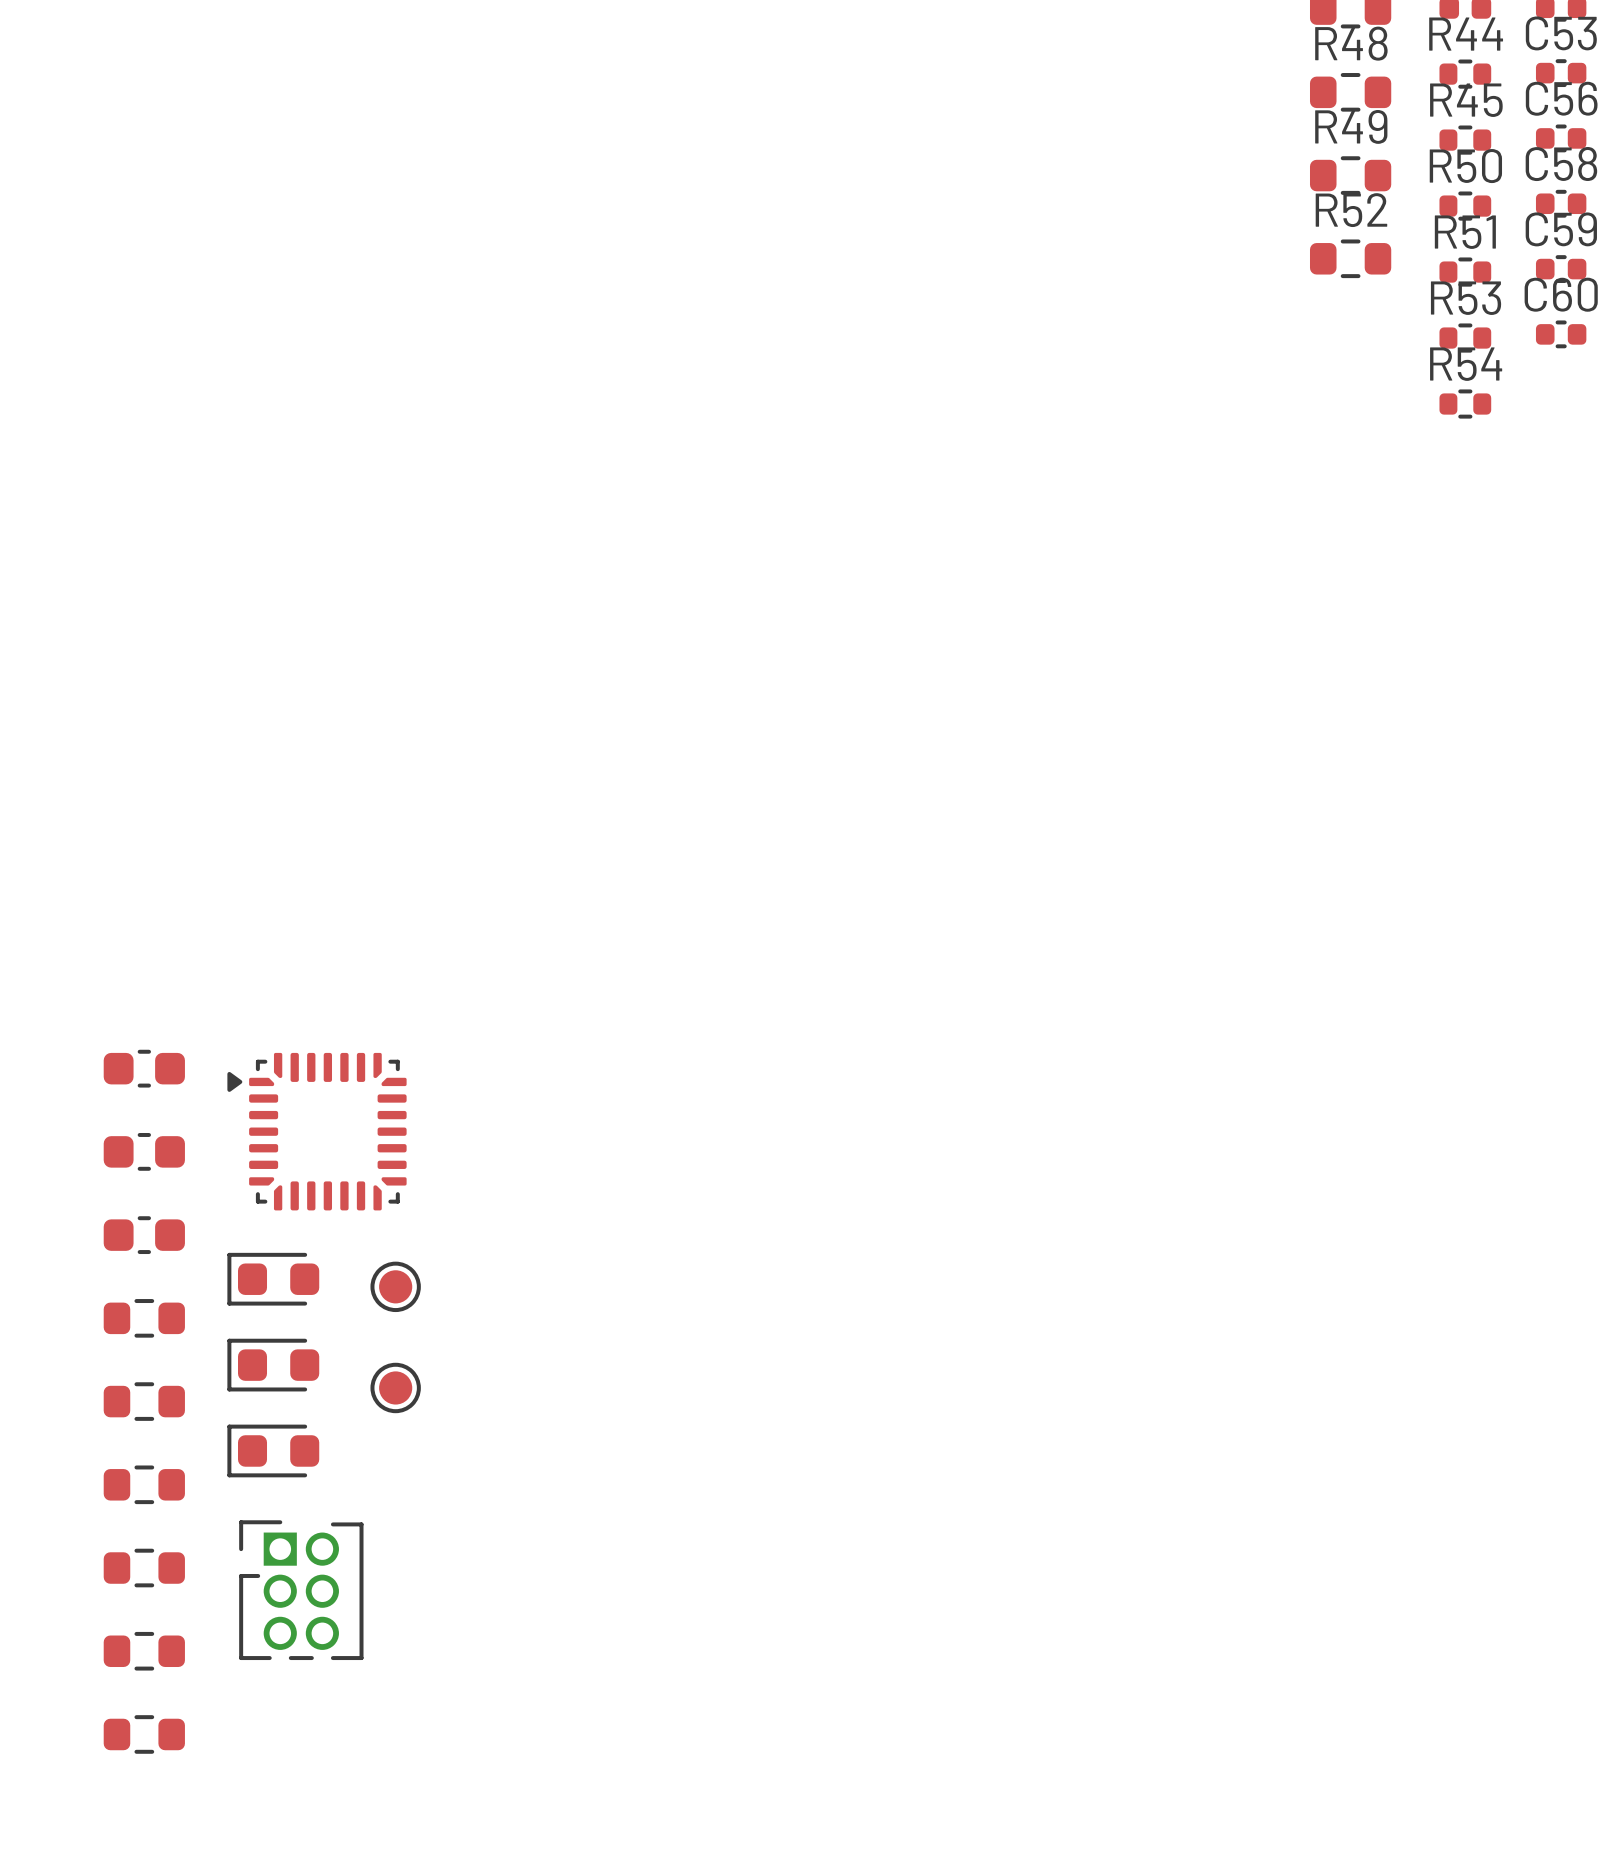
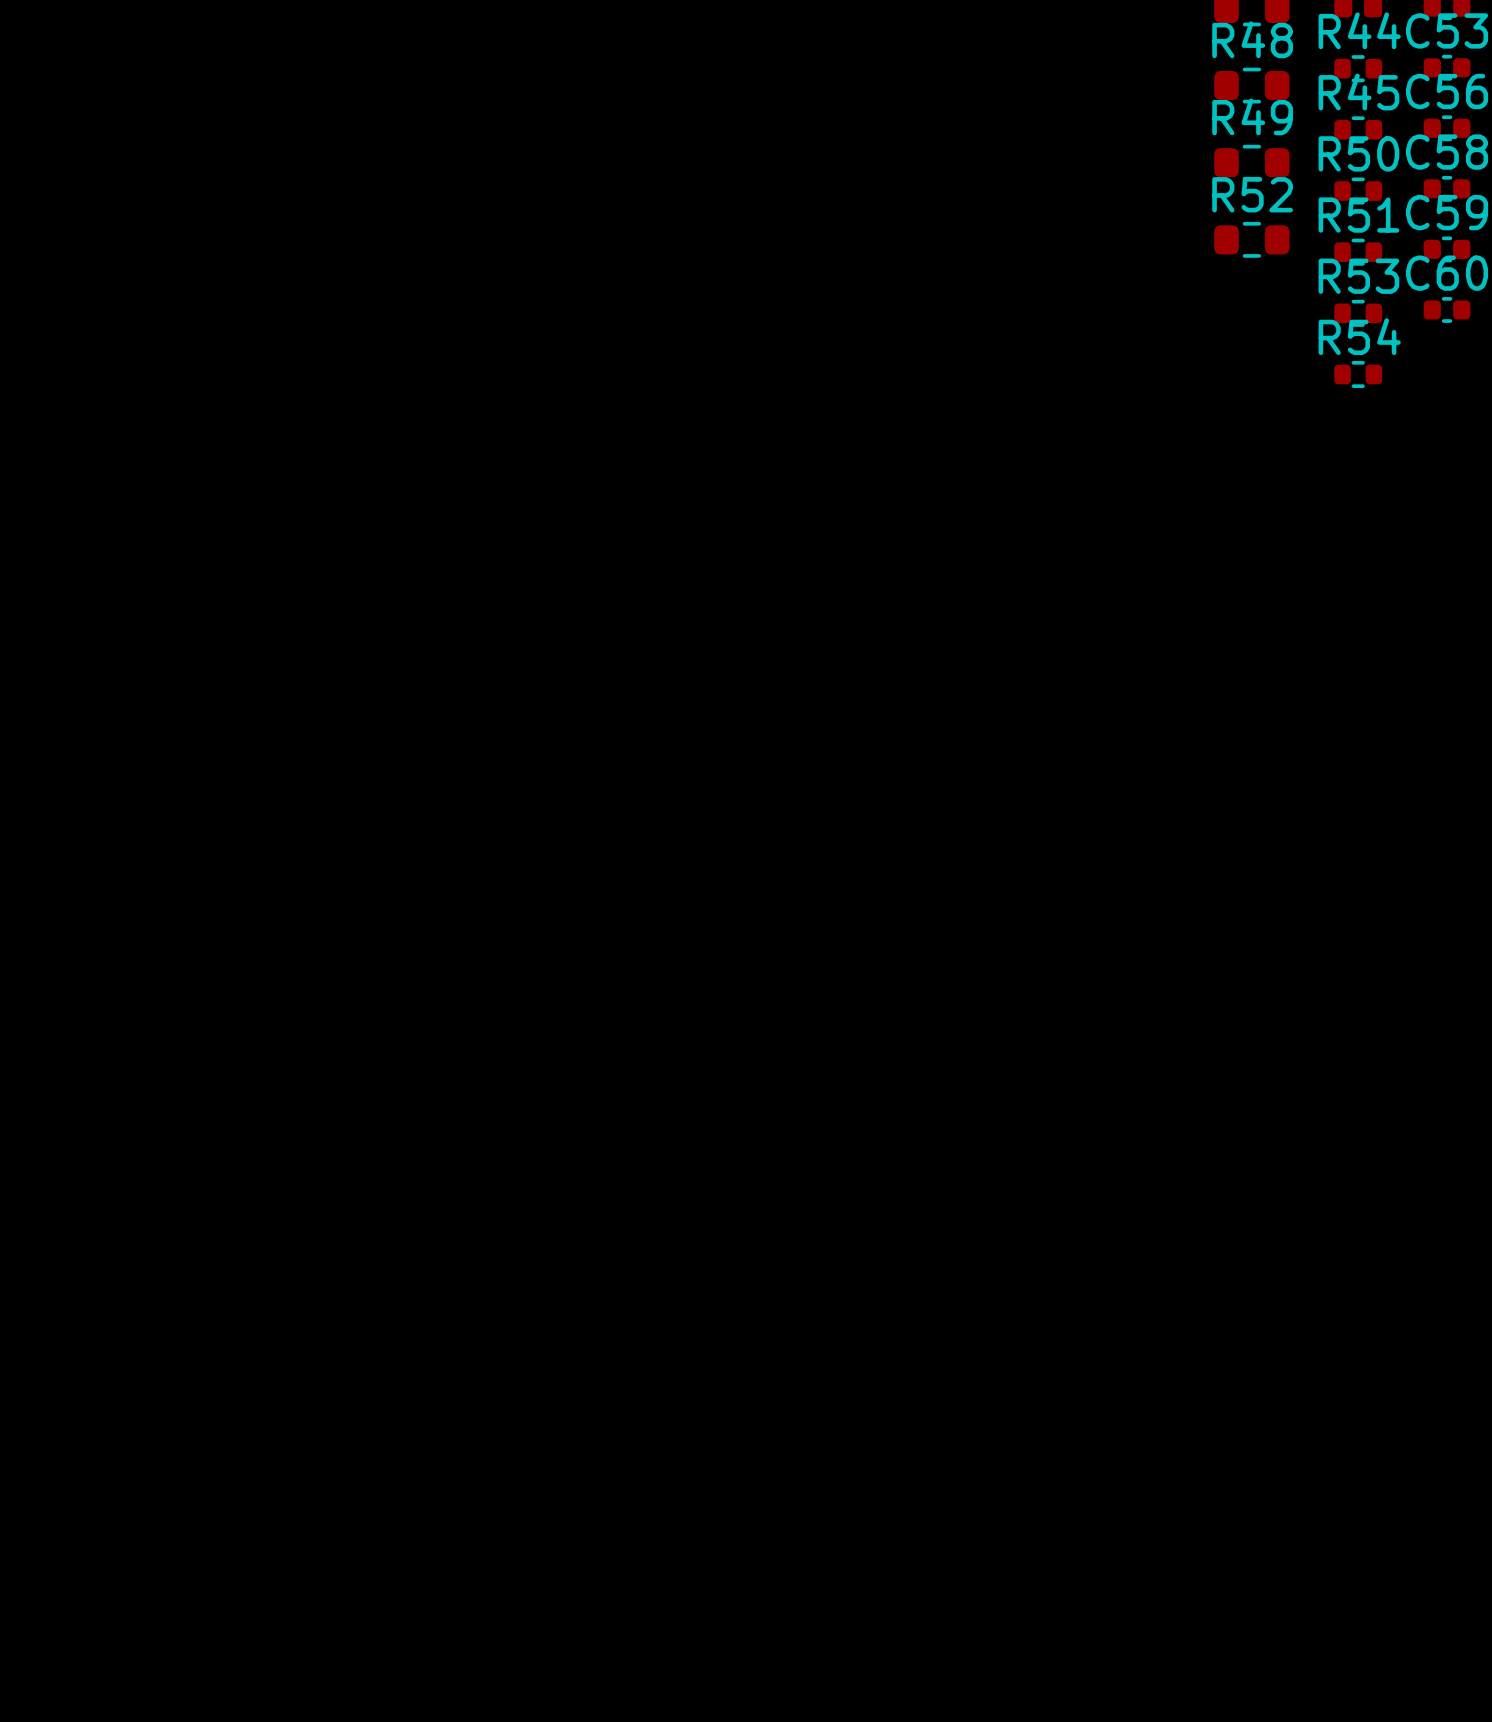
part: (144, 1068) -> none
part: (316, 1131) -> none
part: (144, 1151) -> none
part: (144, 1235) -> none
part: (273, 1279) -> none
part: (395, 1286) -> none
part: (144, 1318) -> none
part: (273, 1365) -> none
part: (395, 1387) -> none
part: (144, 1401) -> none
part: (273, 1450) -> none
part: (144, 1484) -> none
part: (144, 1568) -> none
part: (301, 1590) -> none
part: (144, 1651) -> none
part: (144, 1734) -> none

